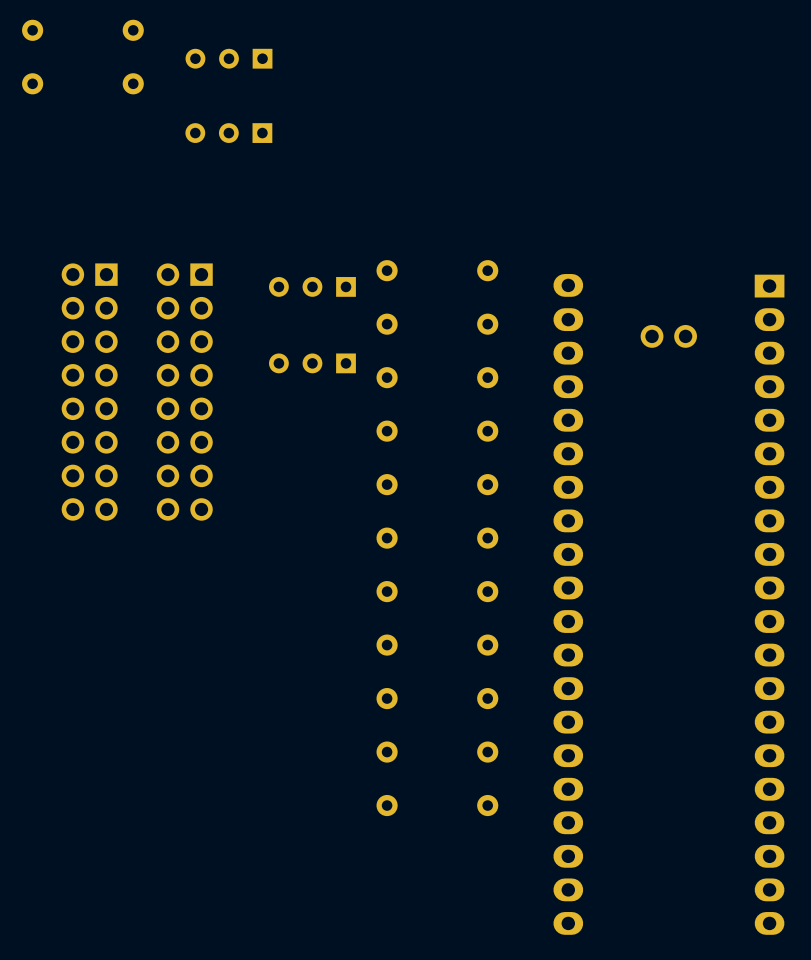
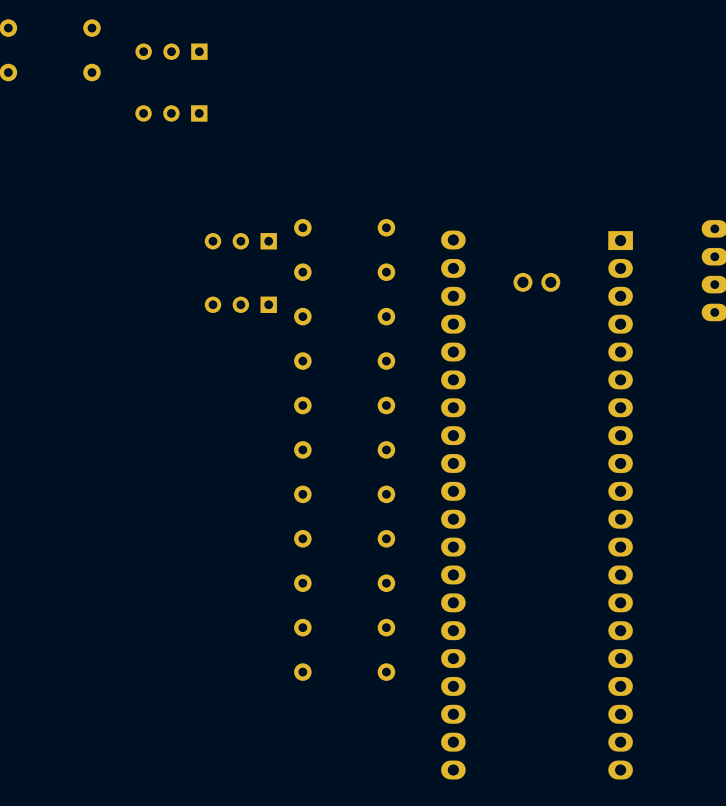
part: (89, 392) -> none
part: (184, 392) -> none

